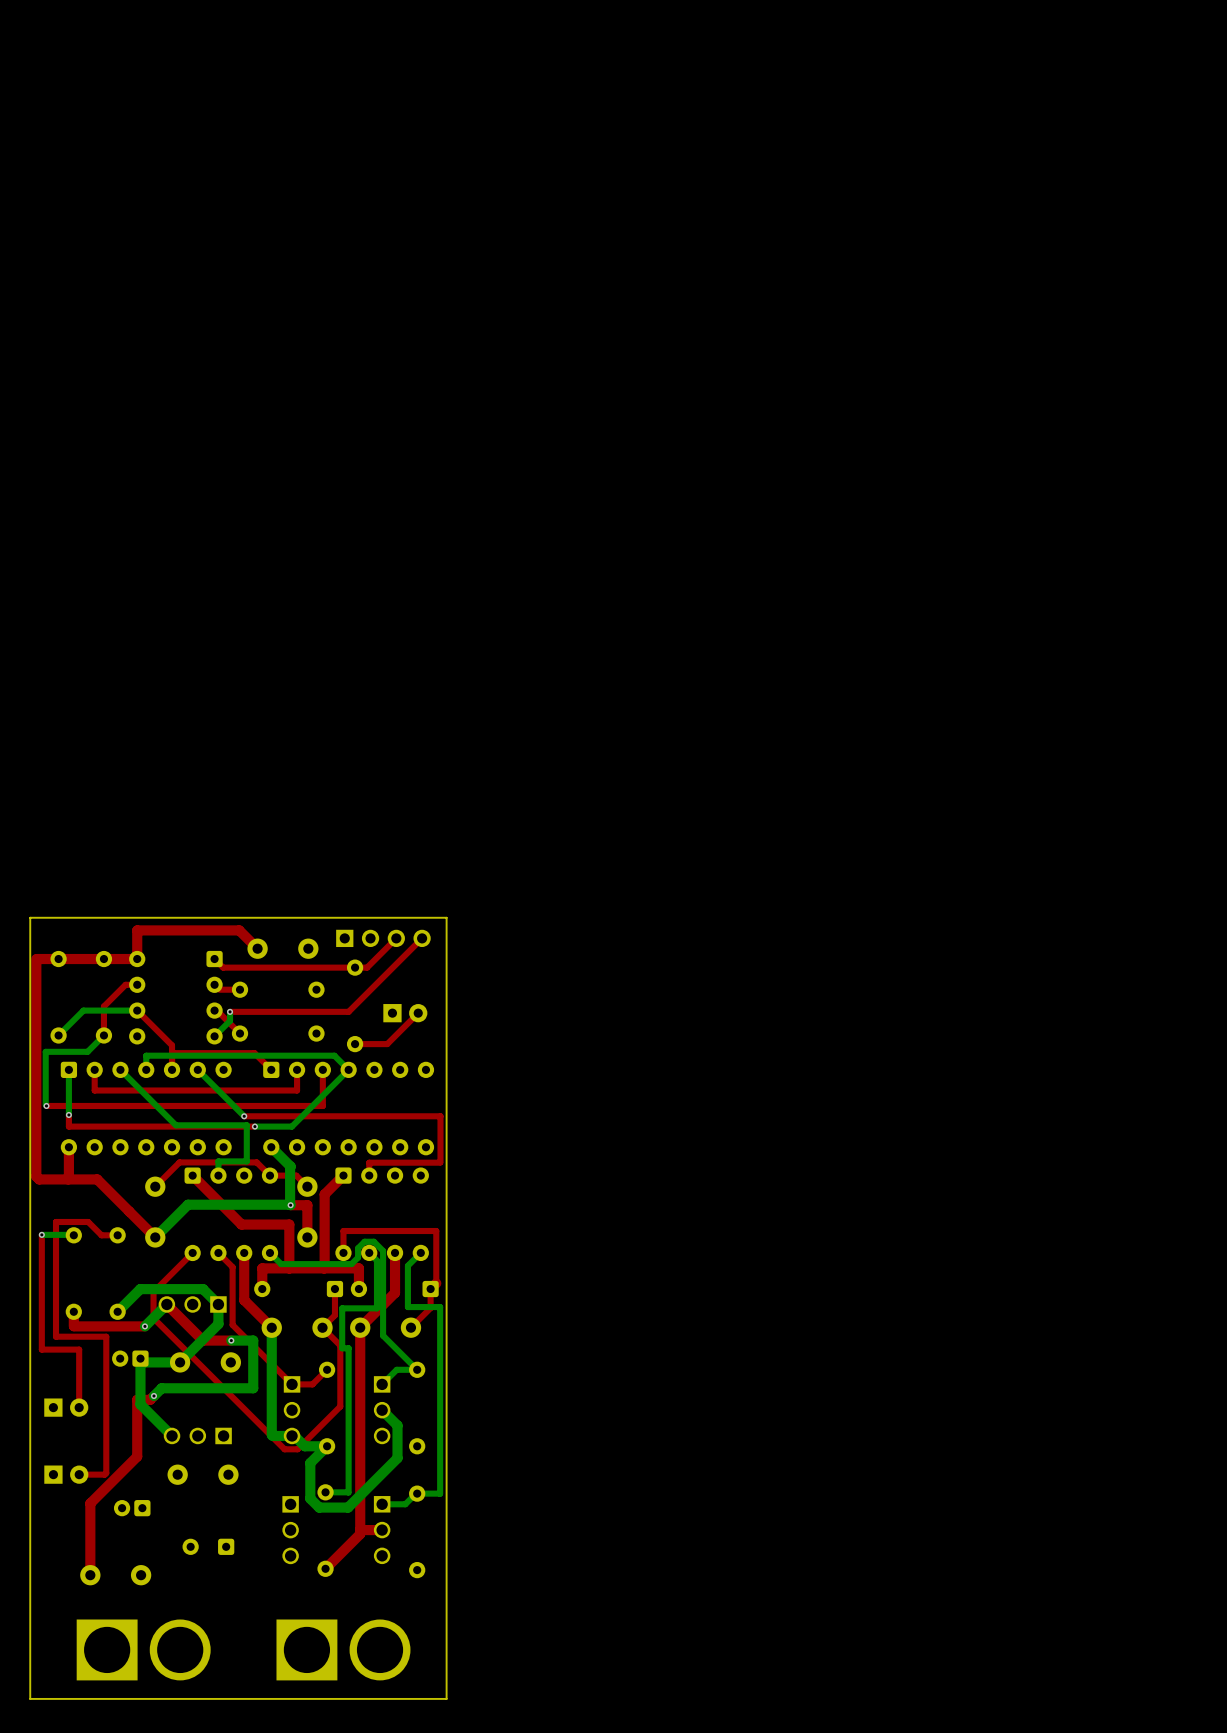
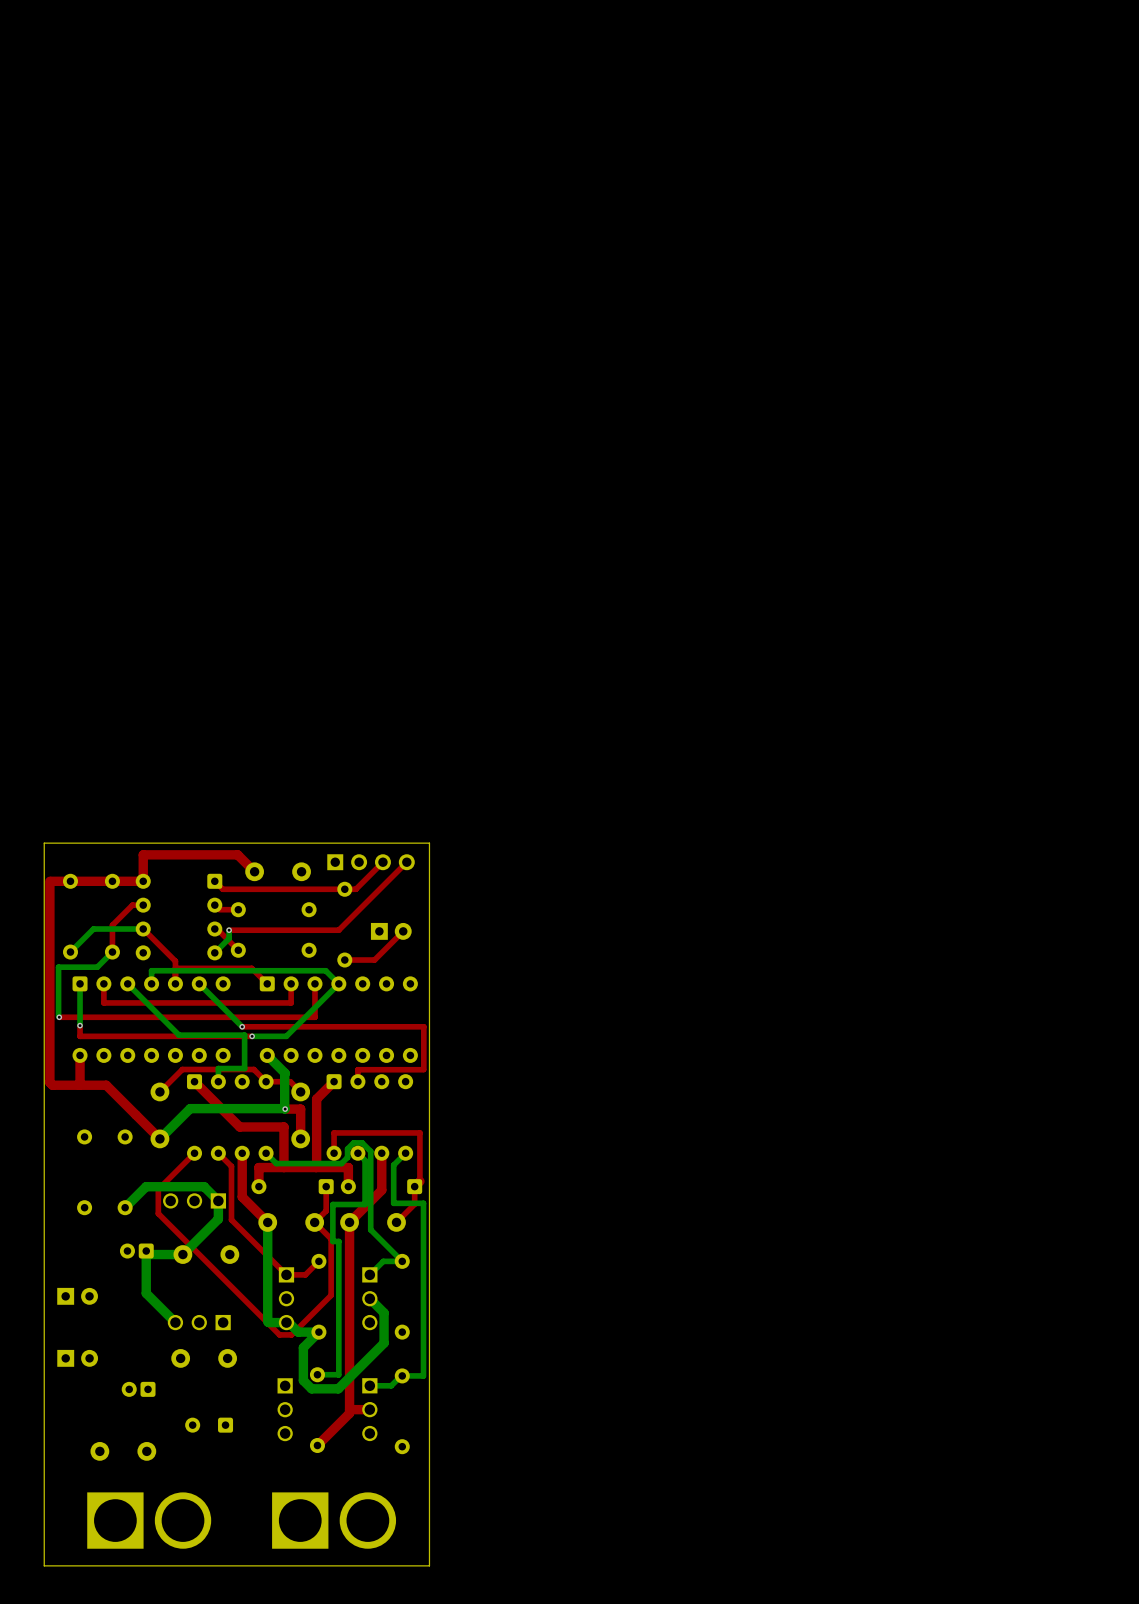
top track: (41, 1234) (41, 1349) (79, 1349) (79, 1407) -> none
bottom track: (41, 1234) (73, 1235) -> none
via: (41, 1234) -> none
top track: (117, 1235) (101, 1235) (88, 1221) (56, 1221) (56, 1336) (106, 1336) (106, 1473) (79, 1474) -> none
top track: (166, 1304) (202, 1340) (231, 1340) -> none
bottom track: (166, 1304) (144, 1326) -> none
top track: (73, 1311) (74, 1326) (144, 1326) -> none
via: (144, 1326) -> none
bottom track: (231, 1340) (253, 1340) (253, 1388) (161, 1388) (153, 1396) -> none
via: (231, 1340) -> none
top track: (153, 1396) (150, 1399) (137, 1399) (137, 1456) (90, 1503) (90, 1575) -> none
via: (153, 1396) -> none

